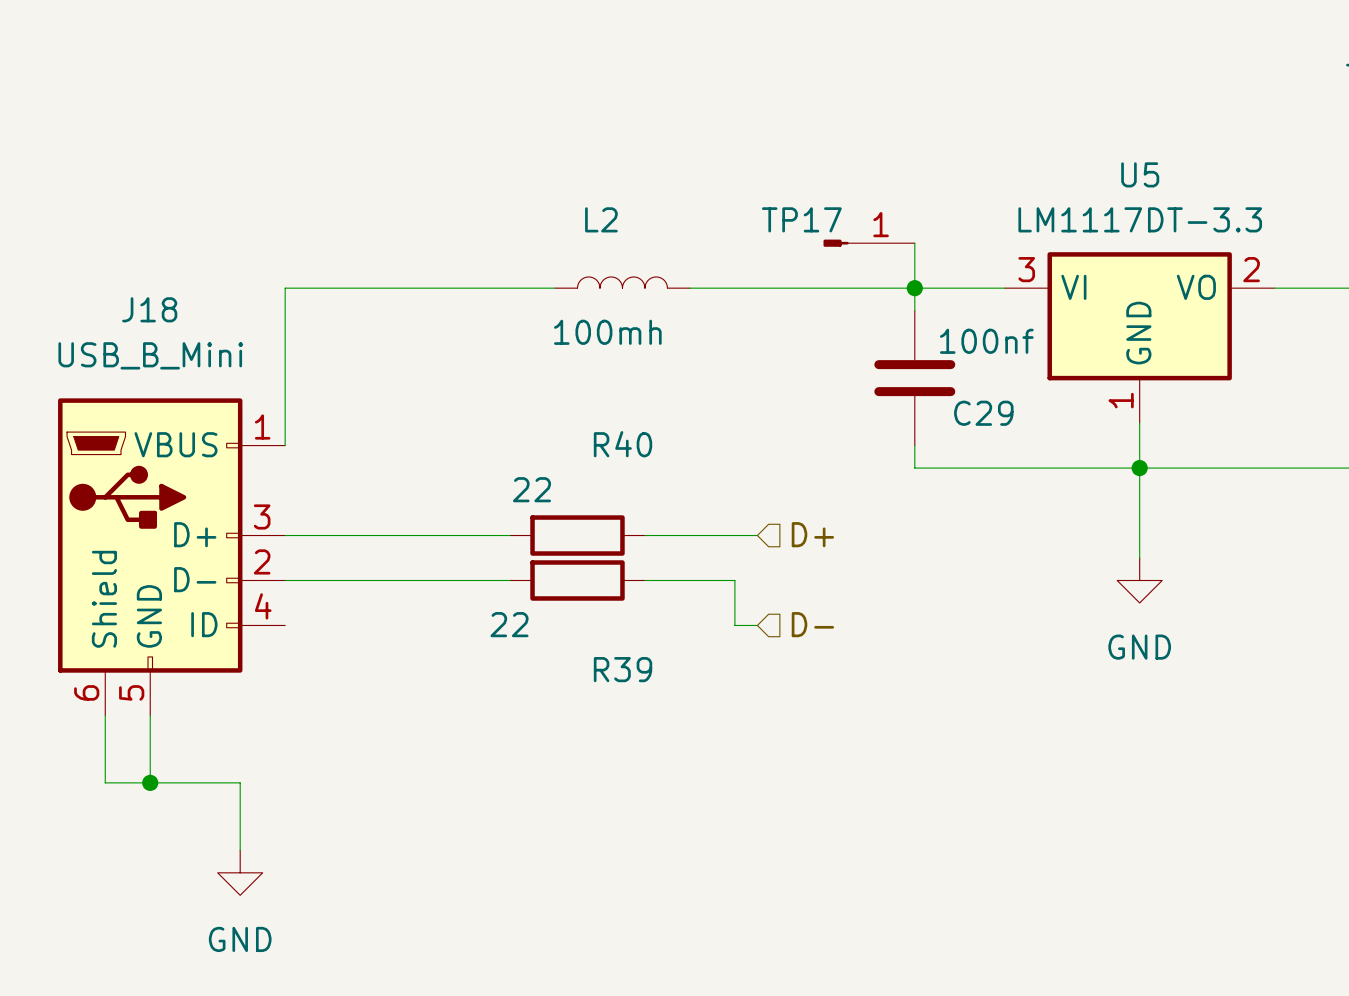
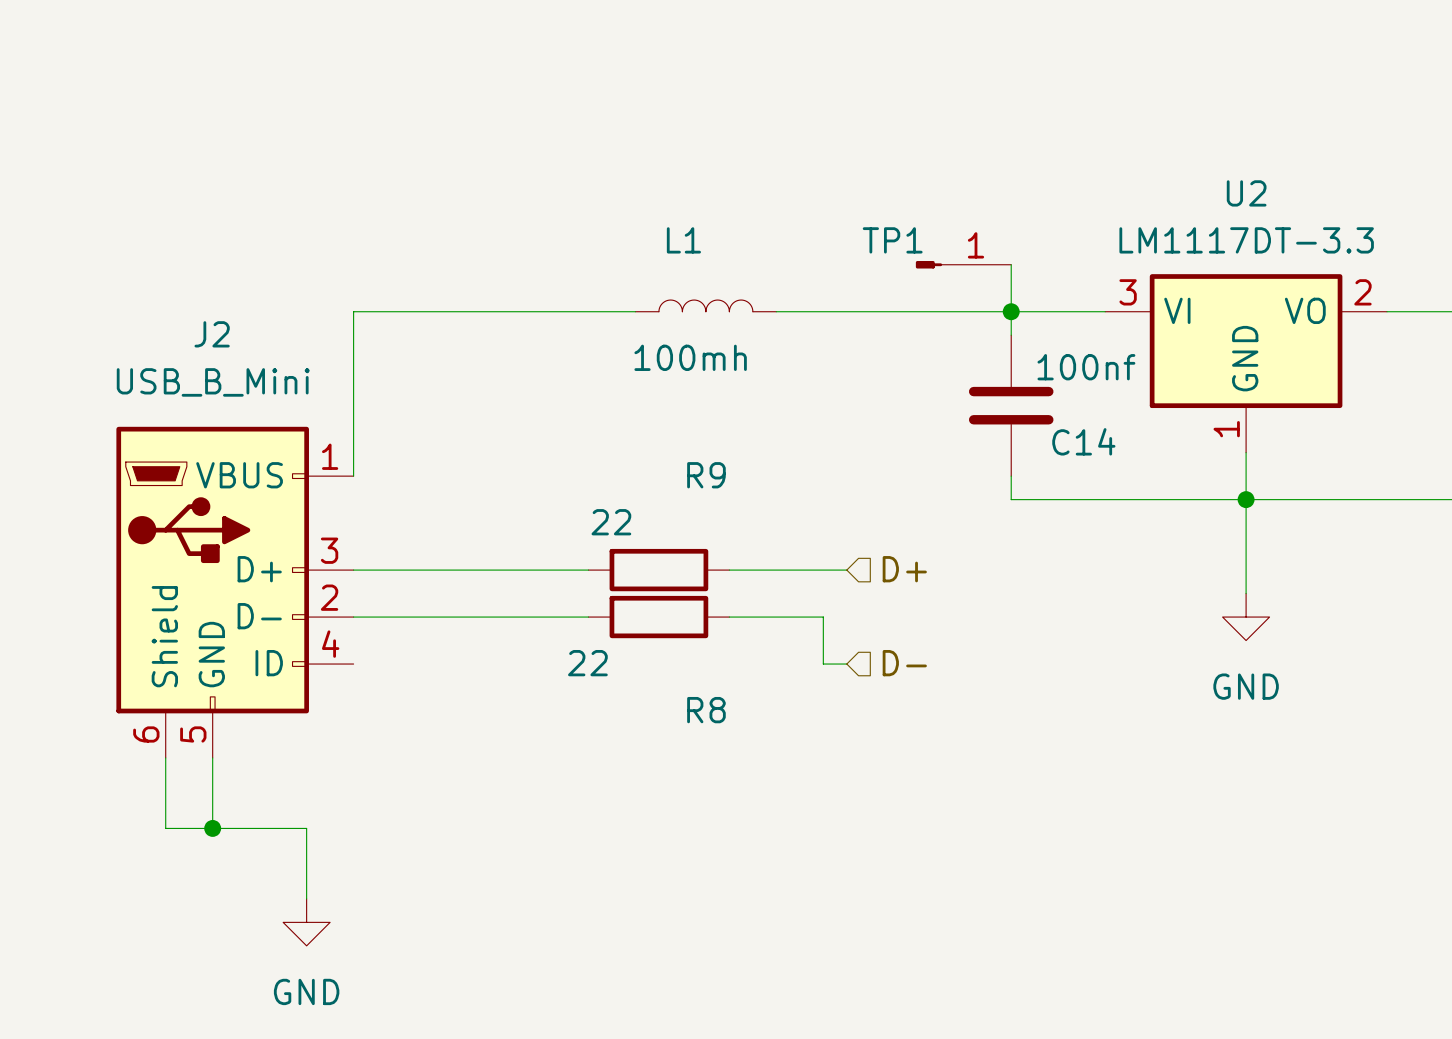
U5 name: U5 (1140, 174) -> U2 (1246, 193)
L2 name: L2 (601, 219) -> L1 (683, 240)
TP17 name: TP17 (801, 219) -> TP1 (892, 240)
J18 name: J18 (149, 309) -> J2 (212, 334)
C29 name: C29 (983, 413) -> C14 (1083, 441)
R40 name: R40 (623, 444) -> R9 (706, 475)
R39 name: R39 (623, 669) -> R8 (706, 710)

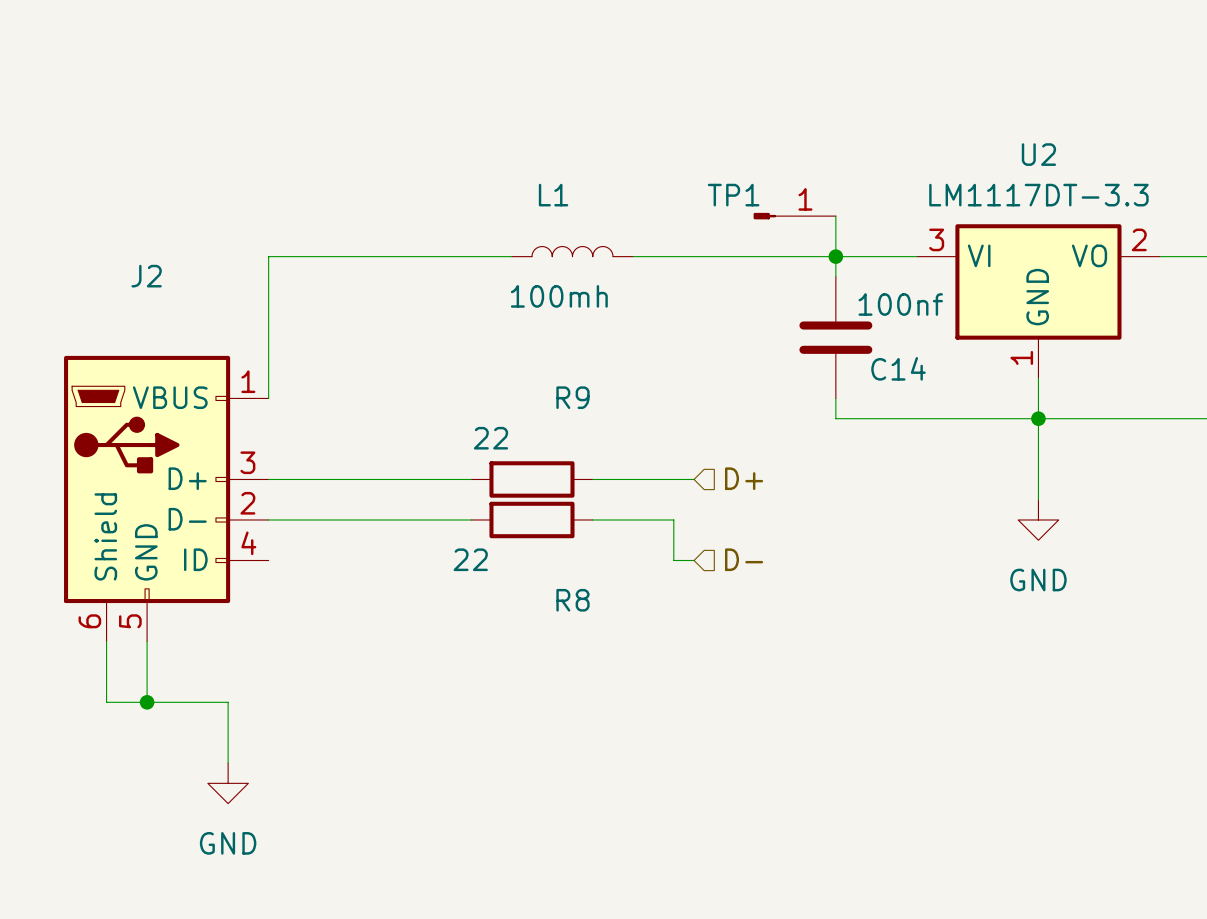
J2 value: USB_B_Mini (213, 382) -> none

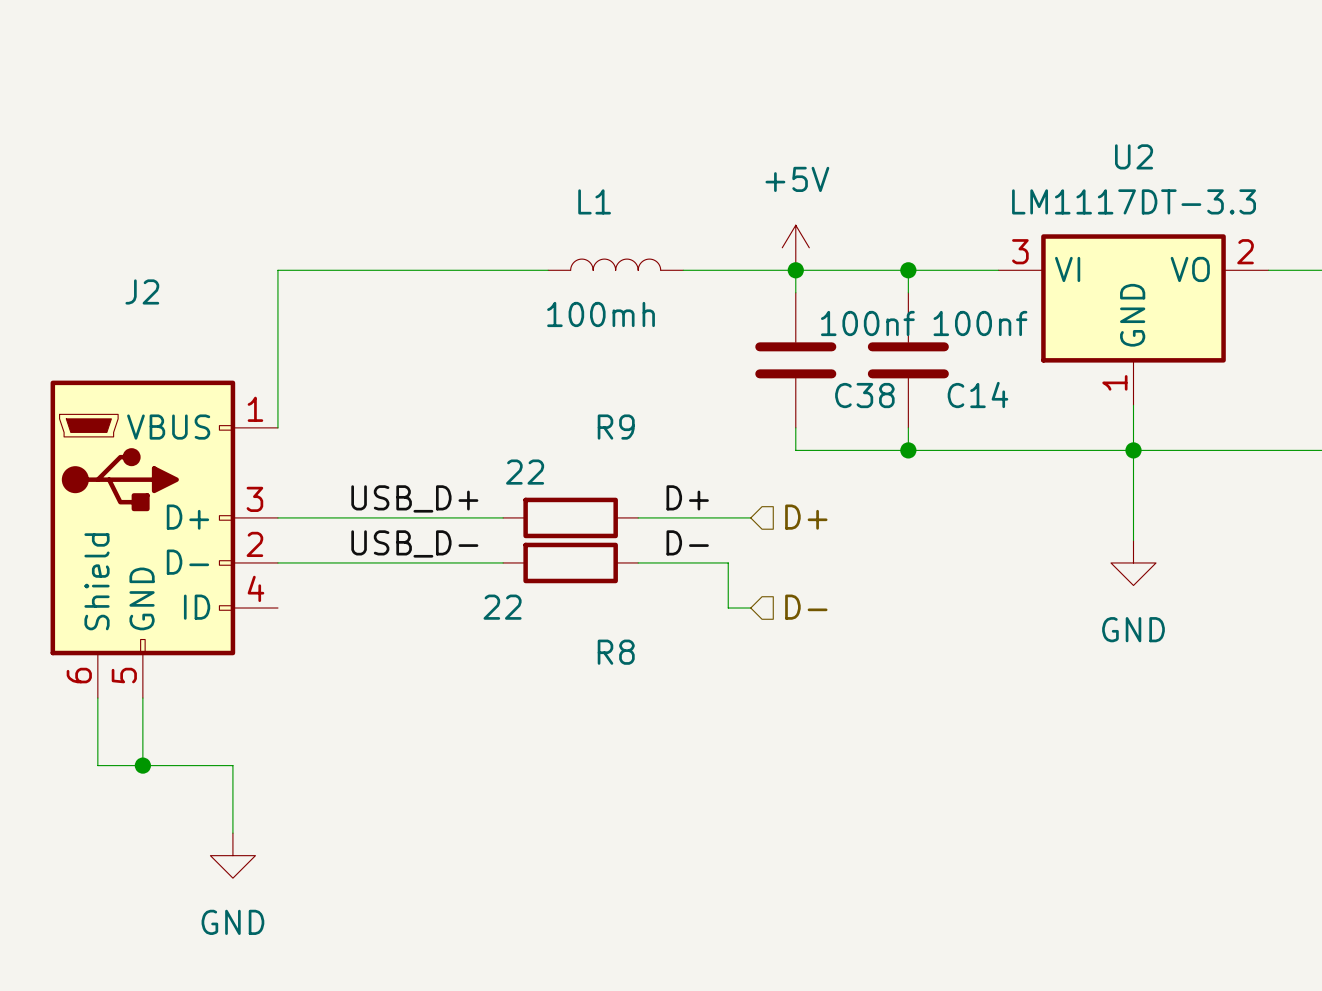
TP1: (794, 216) -> none
wire: (835, 216) (835, 256) -> none
power symbol: none -> +5V (795, 247)
wire: none -> (795, 270) (795, 292)
junction: none -> (795, 270)
C38: none -> 100nf (795, 360)
wire: none -> (795, 427) (795, 450) (908, 450)
junction: none -> (908, 450)
label: none -> D+ (687, 497)
label: none -> USB_D+ (414, 498)
label: none -> D- (687, 542)
label: none -> USB_D- (414, 543)

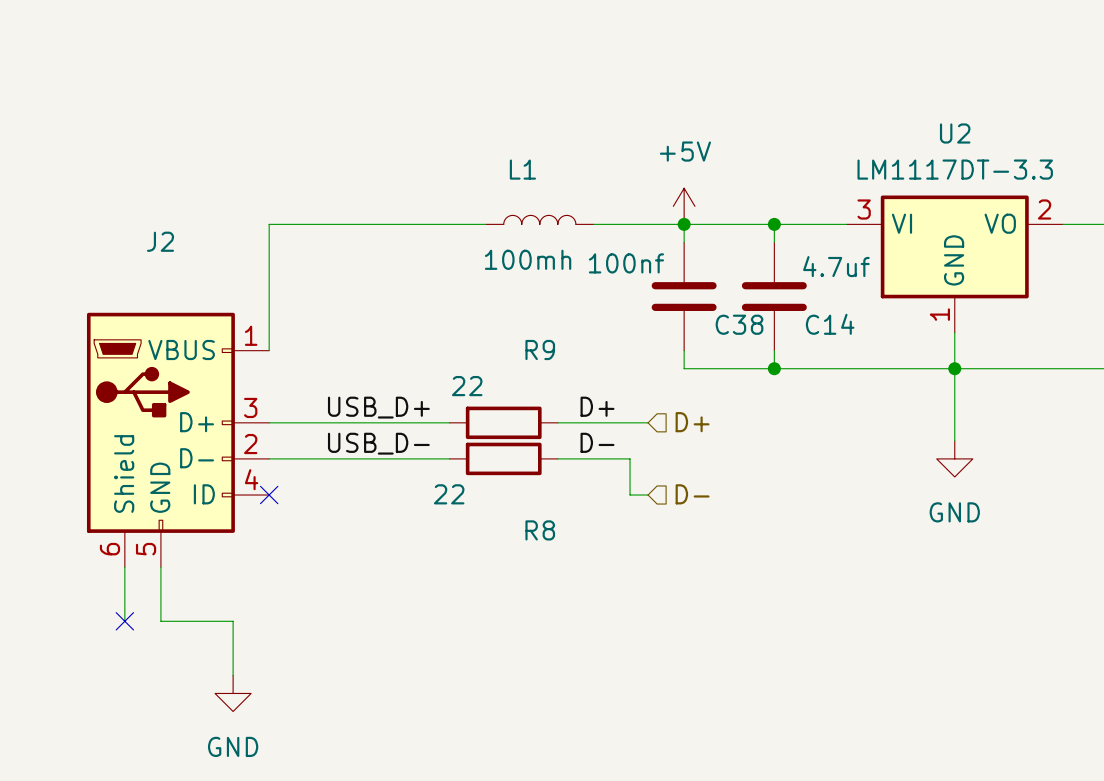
C38 value position: 100nf (867, 323) -> 100nf (626, 263)
C14 value: 100nf (980, 323) -> 4.7uf (836, 266)
no-connect mark: none -> (269, 495)
wire: (97, 765) (142, 765) -> none
no-connect mark: none -> (124, 621)
junction: (142, 765) -> none

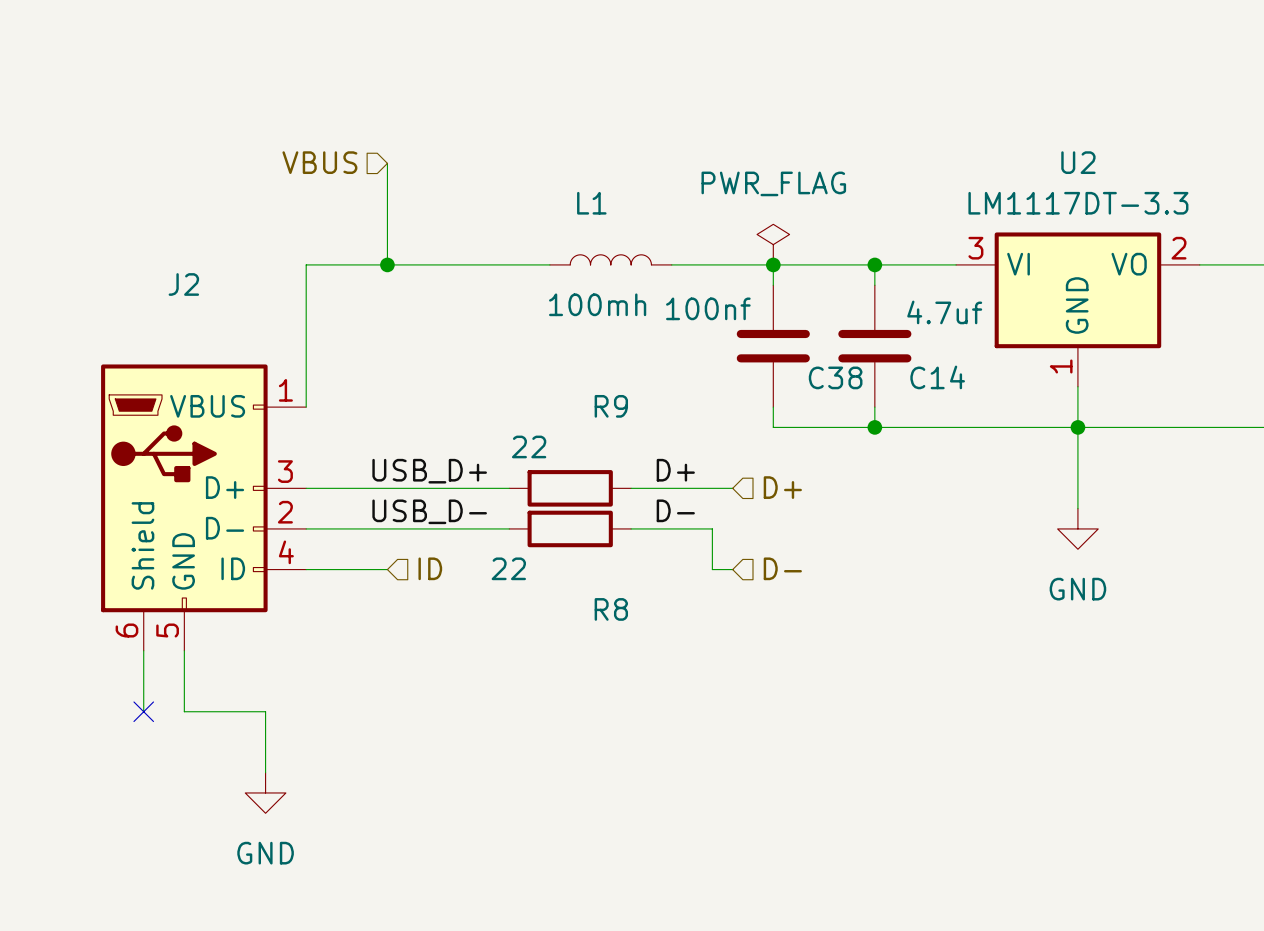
hierarchical label: none -> VBUS (319, 162)
wire: none -> (387, 163) (387, 264)
power symbol: +5V (684, 206) -> PWR_FLAG (773, 244)
junction: none -> (387, 264)
hierarchical label: none -> ID (430, 568)
wire: none -> (306, 569) (387, 569)
no-connect mark: (269, 495) -> none

